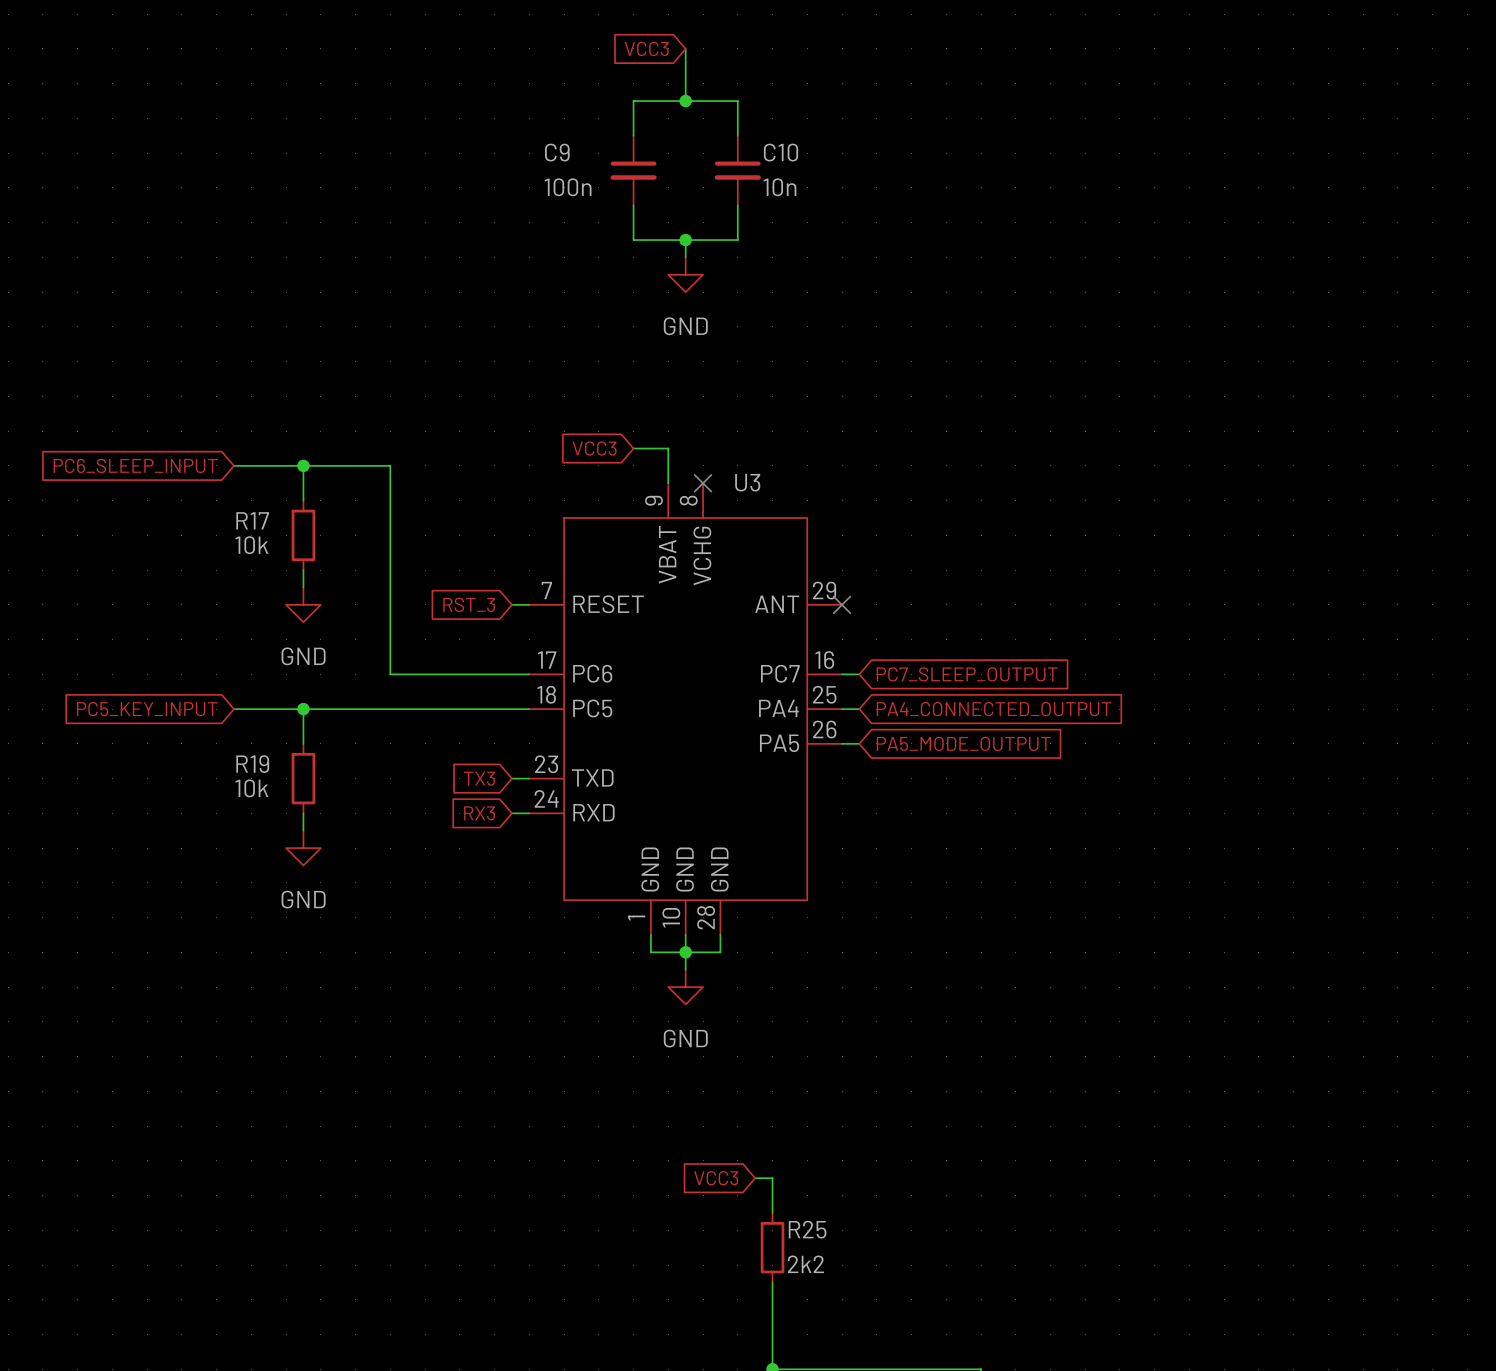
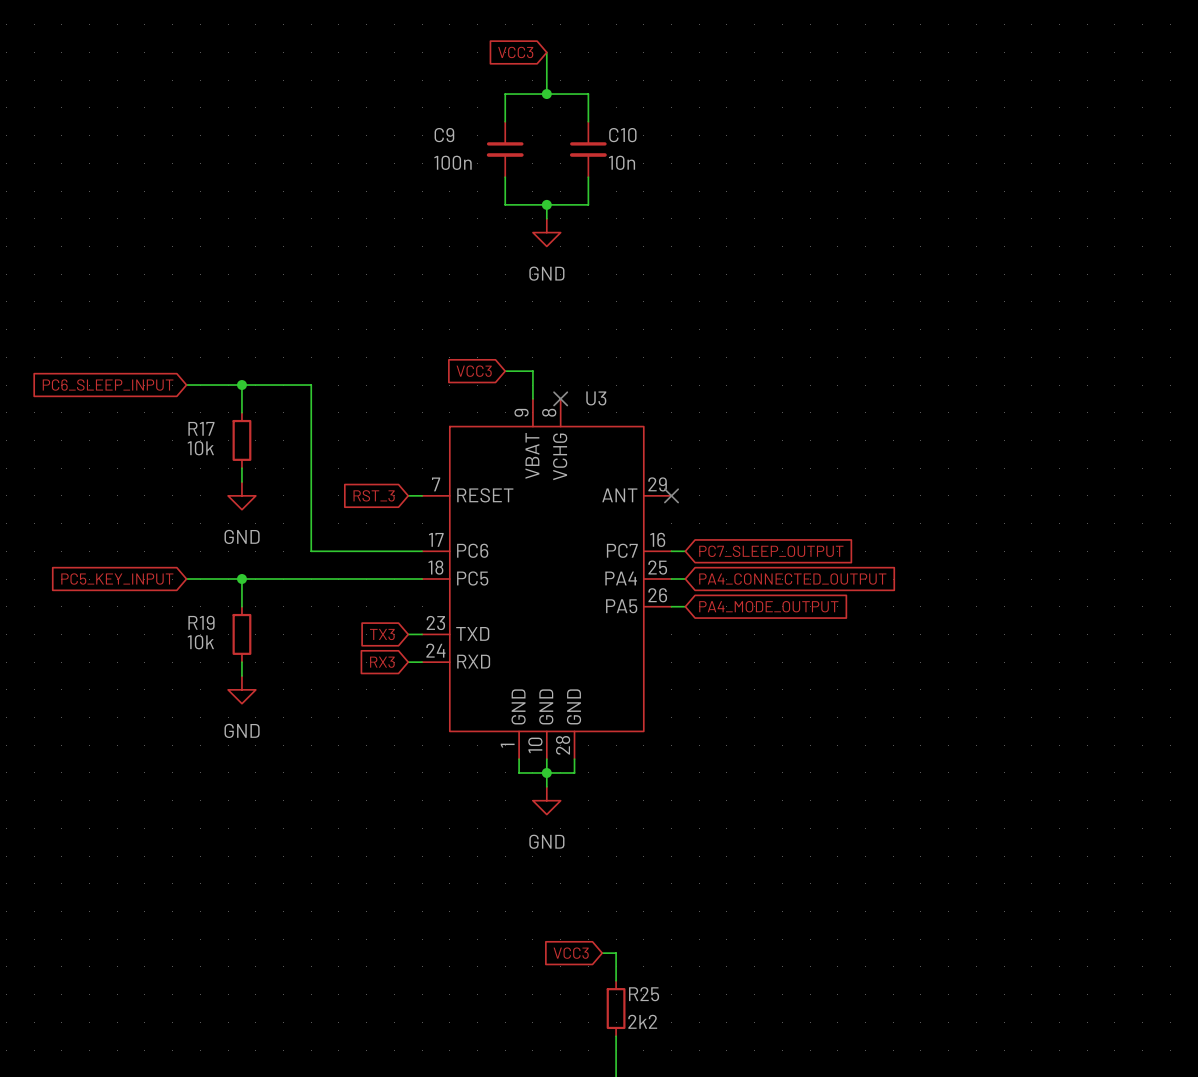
global label: PA5_MODE_OUTPUT (963, 743) -> PA4_MODE_OUTPUT (768, 606)

